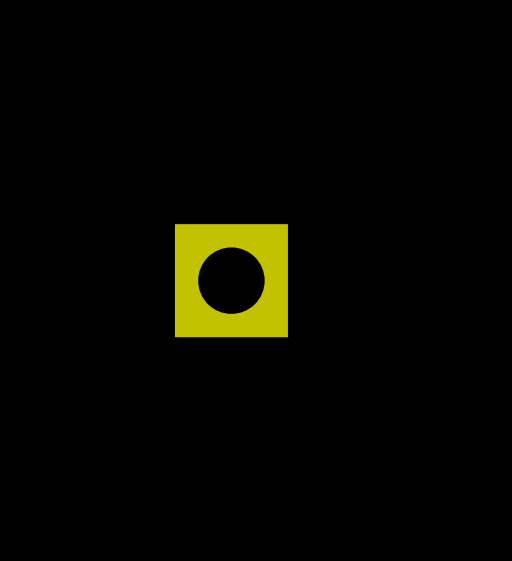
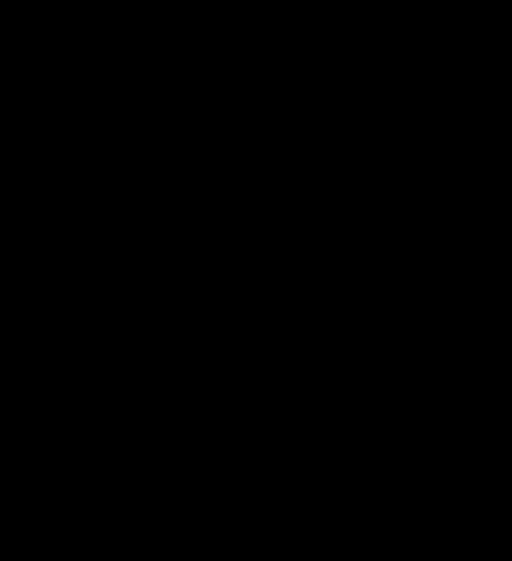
part: (231, 280) -> none

